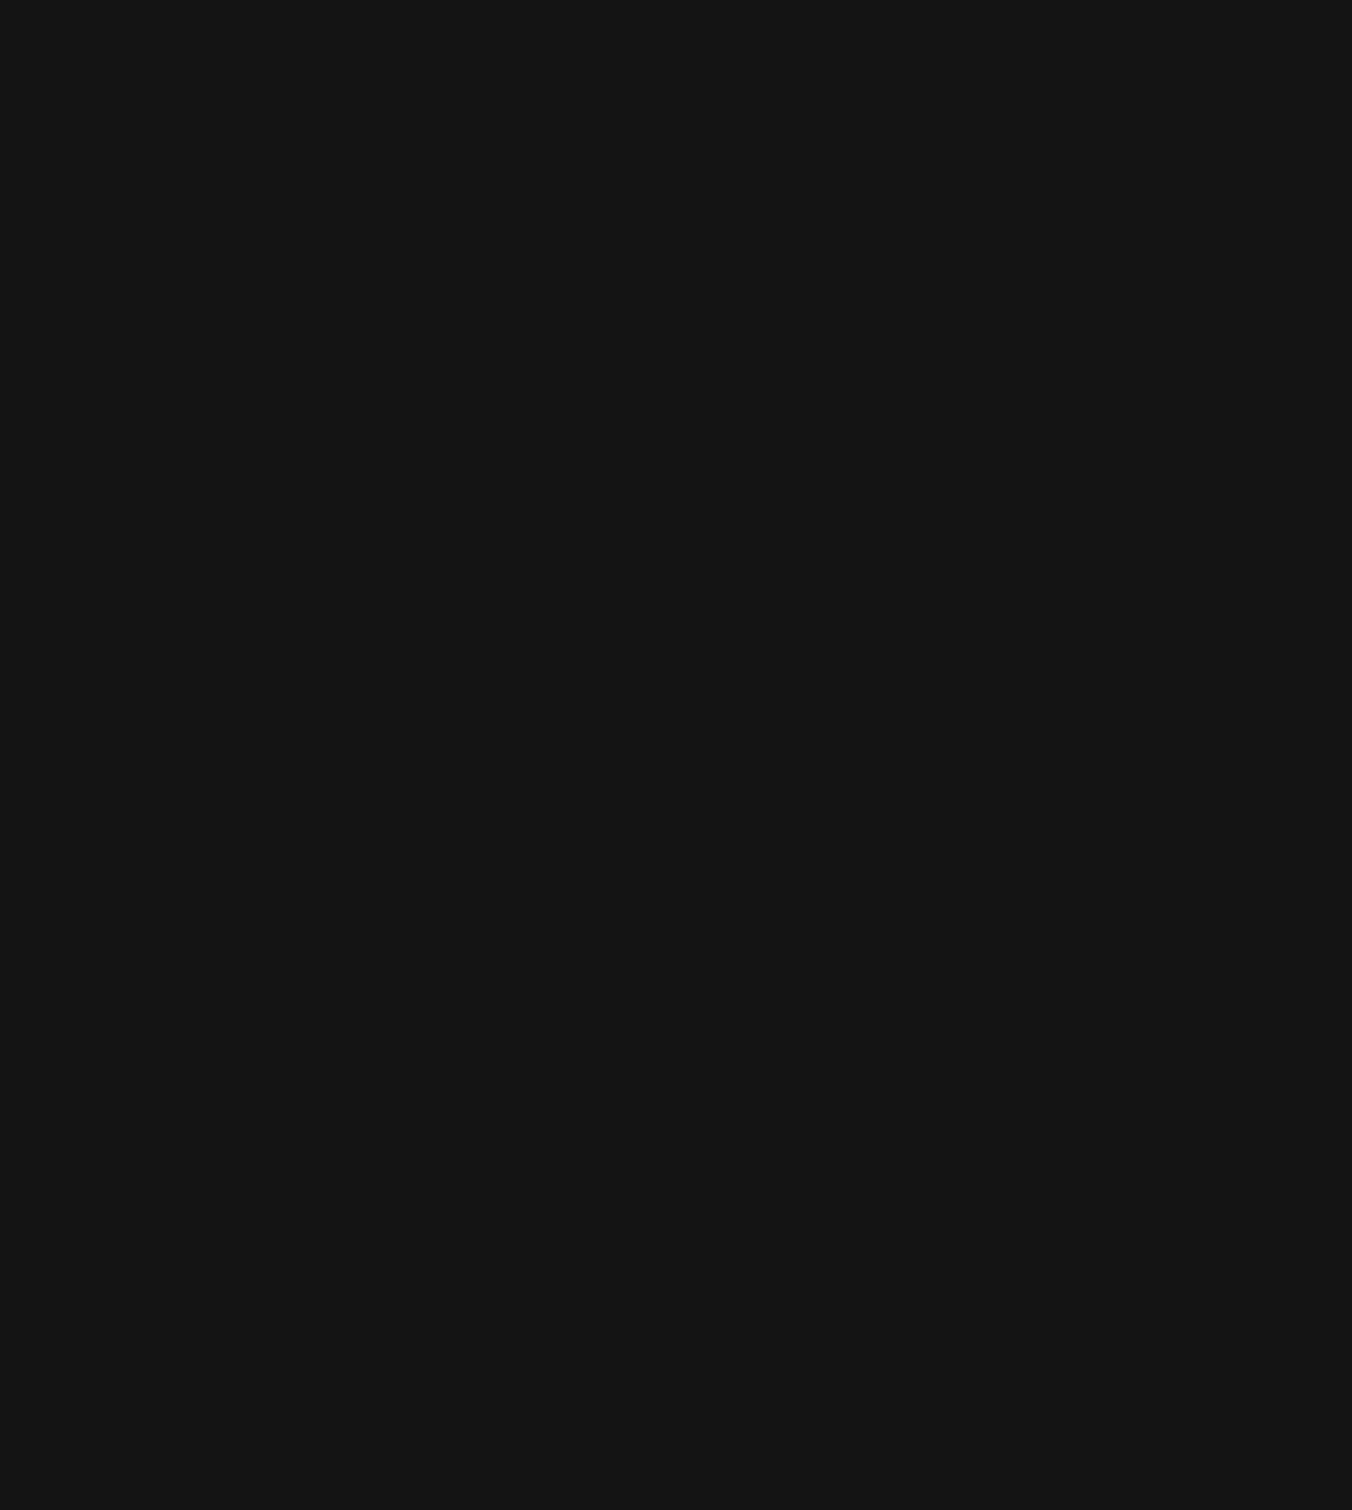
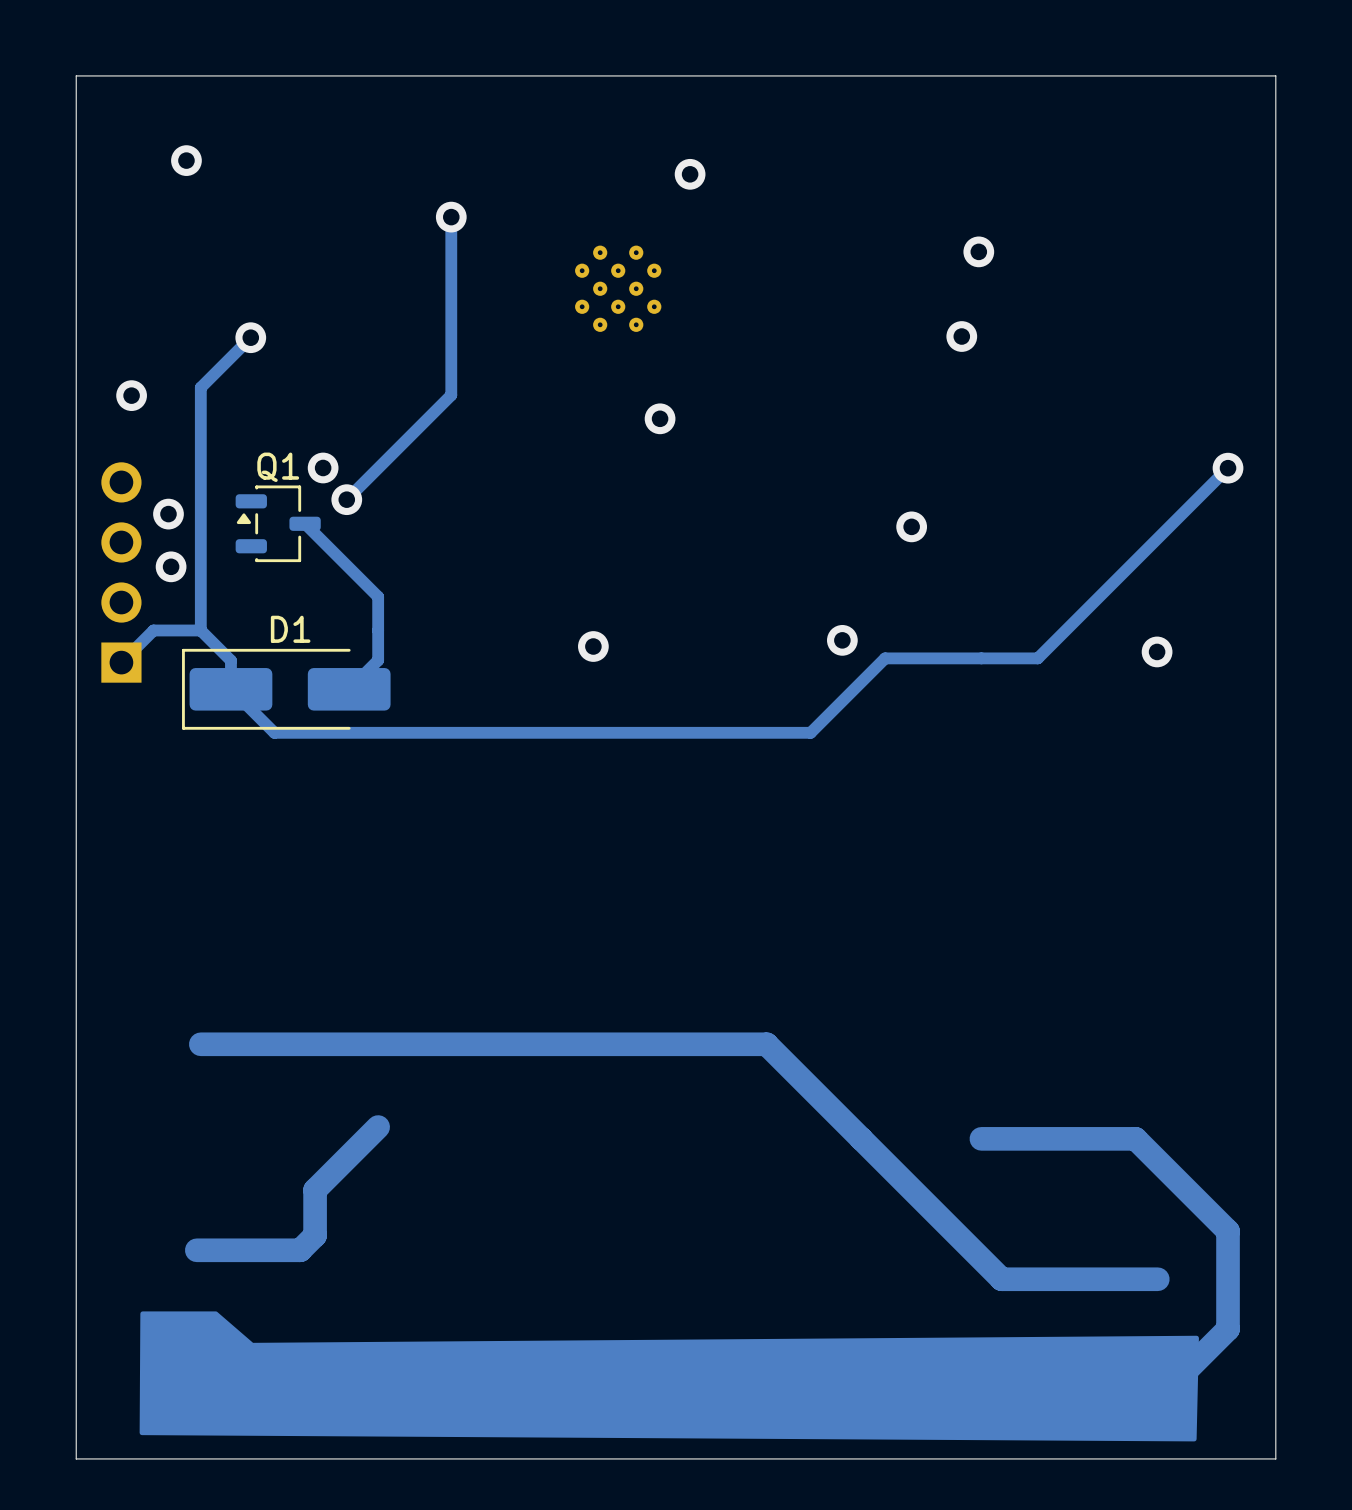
board edge: none -> (1275, 75) (76, 75) (76, 1458) (1275, 1458) (1275, 75)
via: none -> (186, 160)
via: none -> (690, 174)
track: none -> (451, 217) (451, 395) (346, 499)
via: none -> (451, 217)
via: none -> (978, 251)
part: none -> (618, 288)
via: none -> (961, 336)
track: none -> (250, 337) (200, 387) (200, 630)
via: none -> (250, 337)
via: none -> (131, 395)
via: none -> (660, 418)
via: none -> (323, 467)
track: none -> (1228, 468) (1037, 658) (885, 658) (810, 732) (274, 732) (230, 689) (230, 660) (200, 630)
via: none -> (1228, 468)
via: none -> (346, 499)
via: none -> (168, 514)
Q1: none -> (278, 523)
track: none -> (305, 523) (378, 596) (378, 660) (349, 689)
via: none -> (911, 526)
via: none -> (171, 566)
part: none -> (121, 572)
track: none -> (200, 630) (153, 630) (121, 662)
via: none -> (842, 640)
via: none -> (593, 646)
via: none -> (1157, 651)
D1: none -> (286, 689)
track: none -> (200, 1044) (766, 1044) (1001, 1279) (1157, 1279)
track: none -> (378, 1127) (315, 1190) (315, 1235) (300, 1250) (196, 1250)
track: none -> (981, 1138) (1135, 1138) (1228, 1231) (1228, 1329) (1157, 1399)
drawing: none -> [139, 1311, 1199, 1442]

